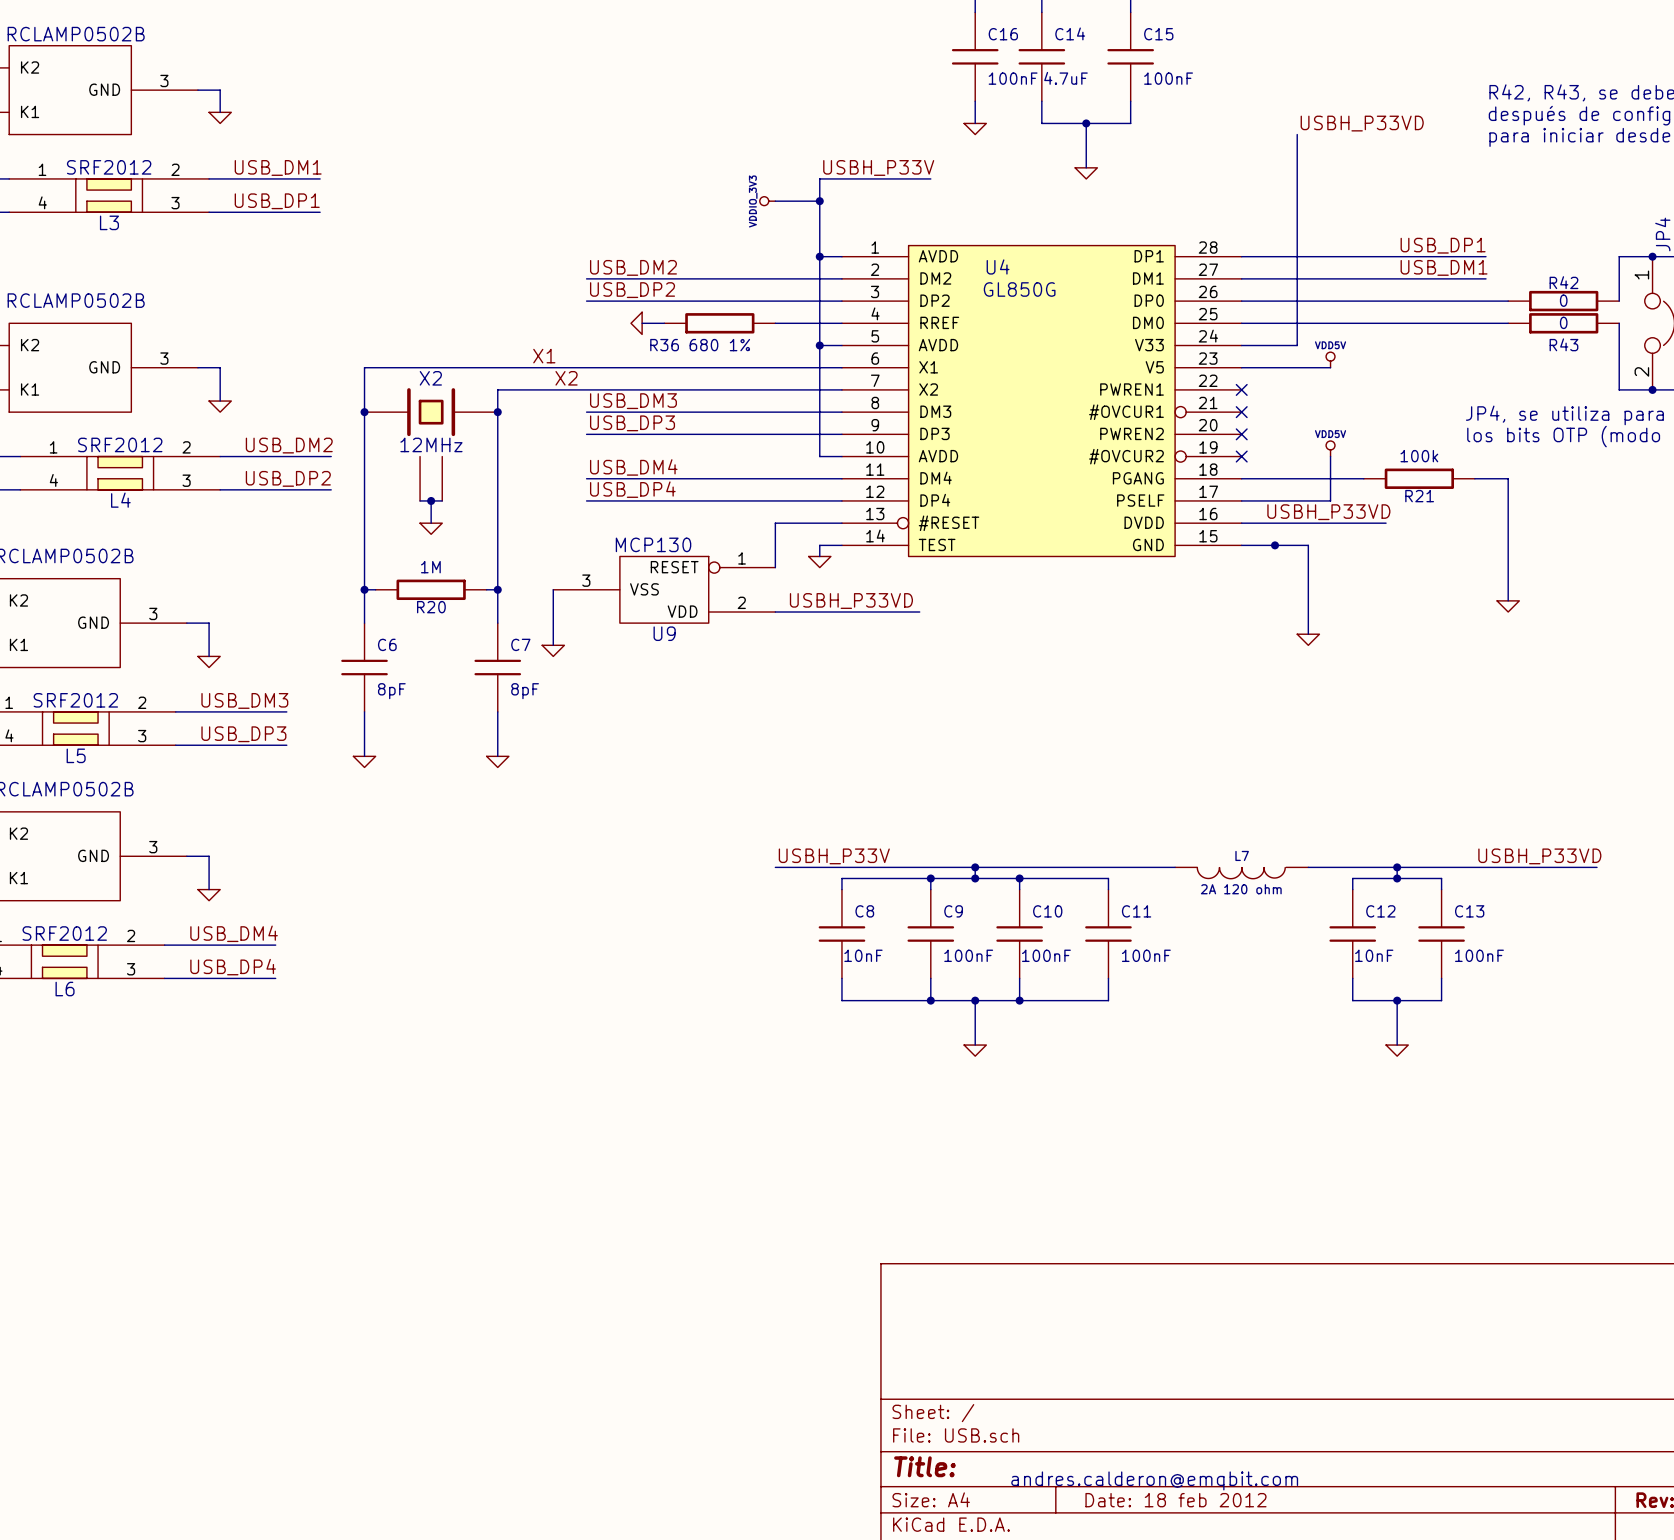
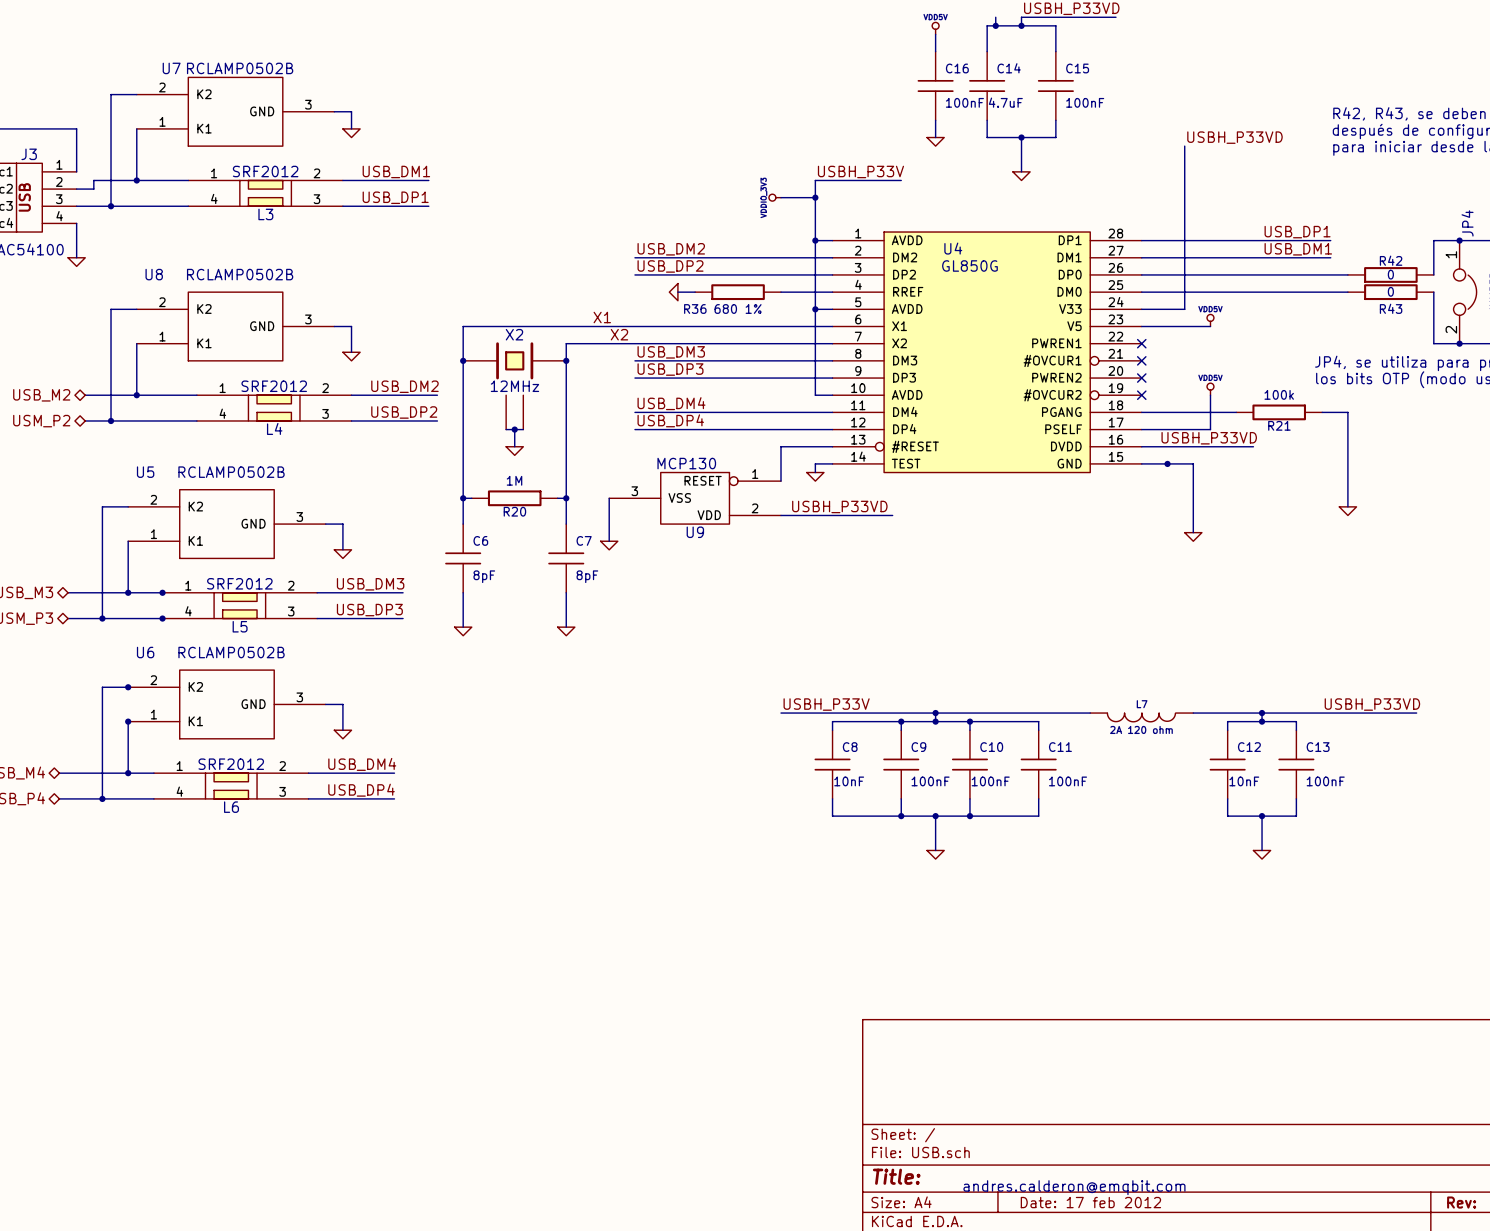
title block: Date: 18 feb 2012 (1175, 1500) -> Date: 17 feb 2012 (1090, 1202)

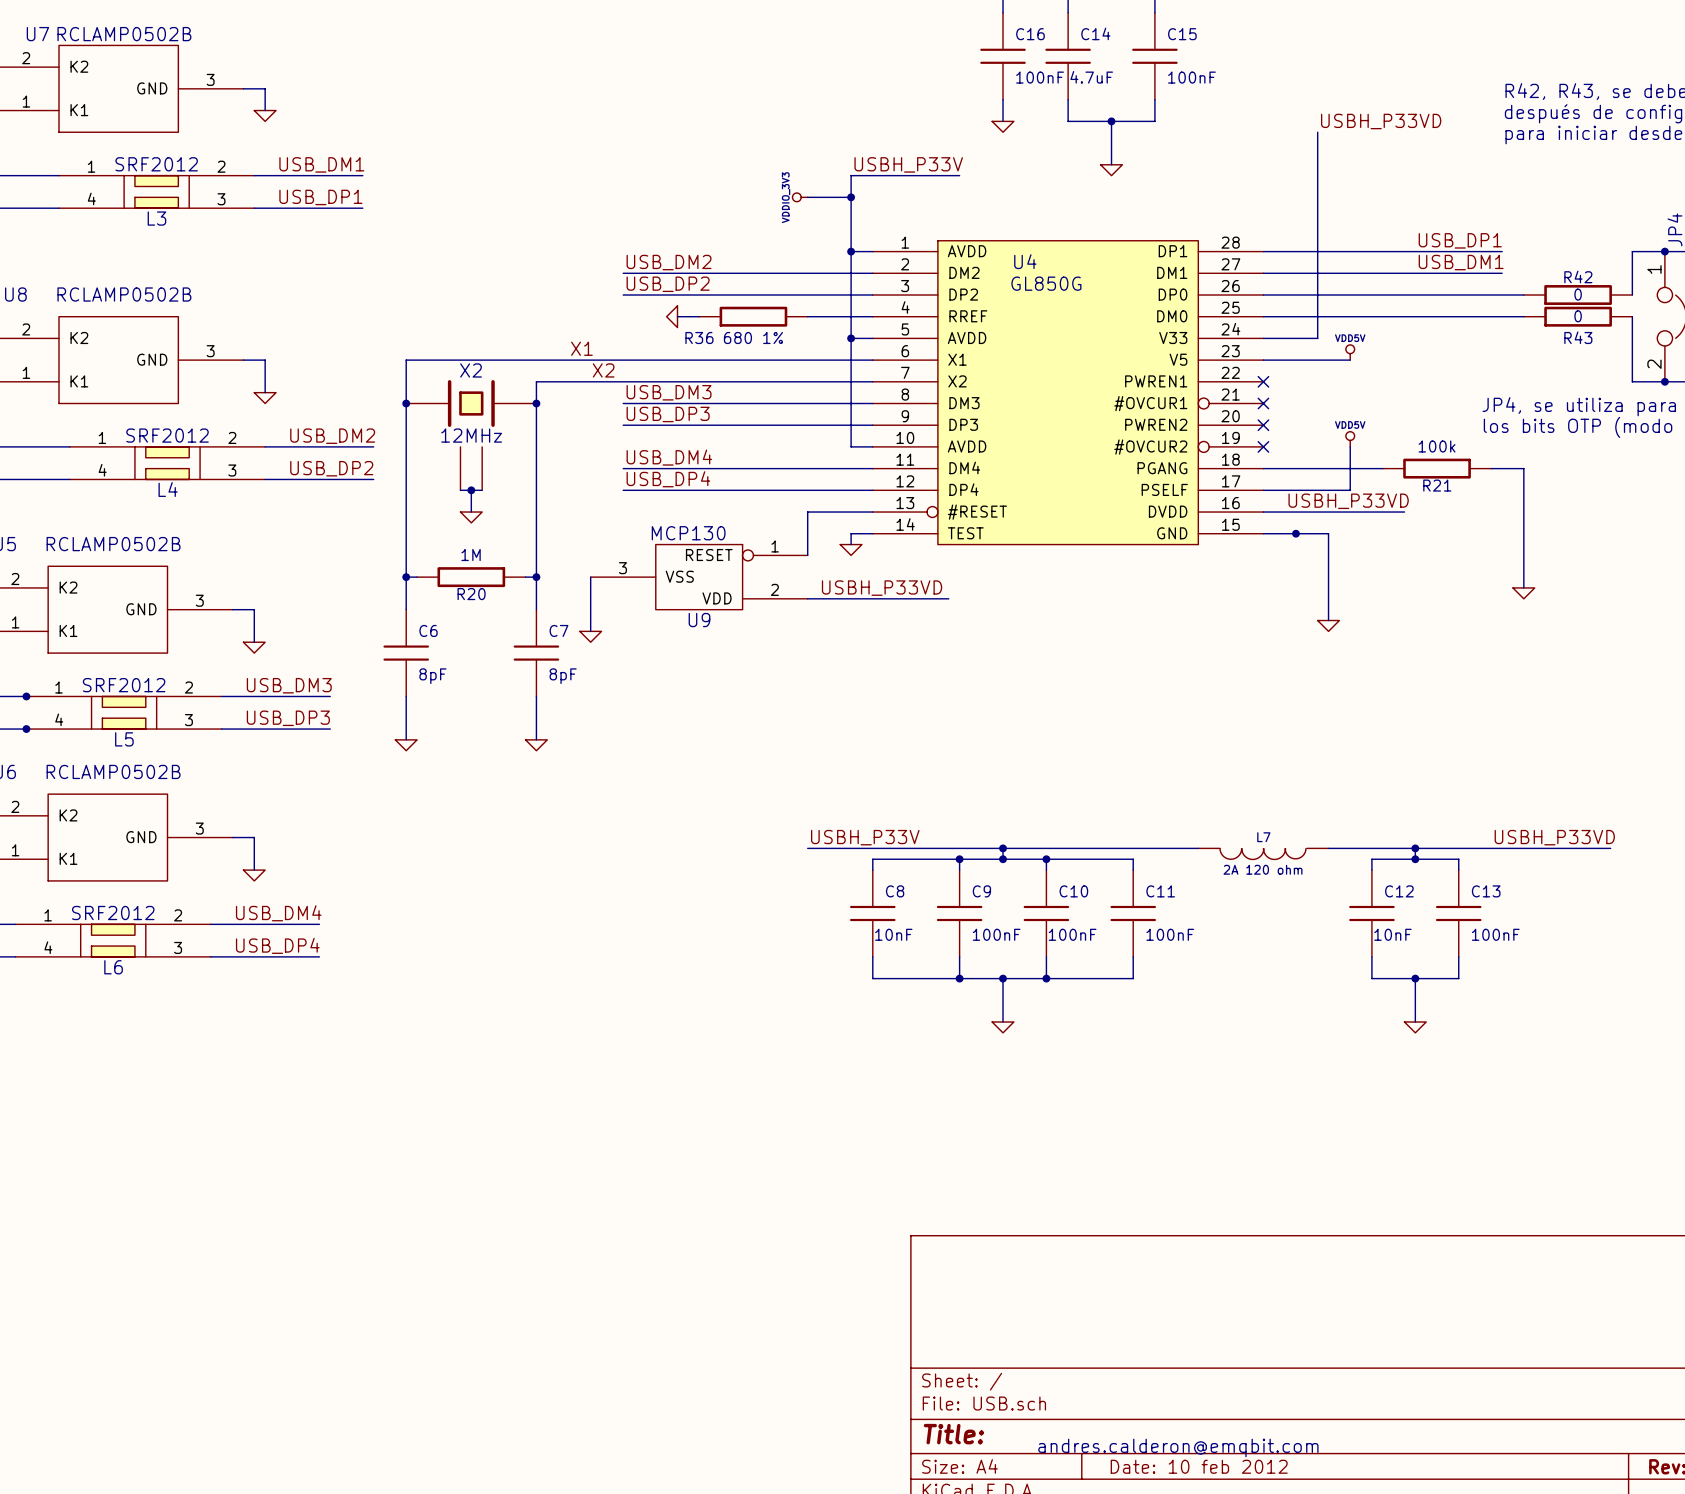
title block: Date: 17 feb 2012 (1090, 1202) -> Date: 10 feb 2012 (1199, 1466)

